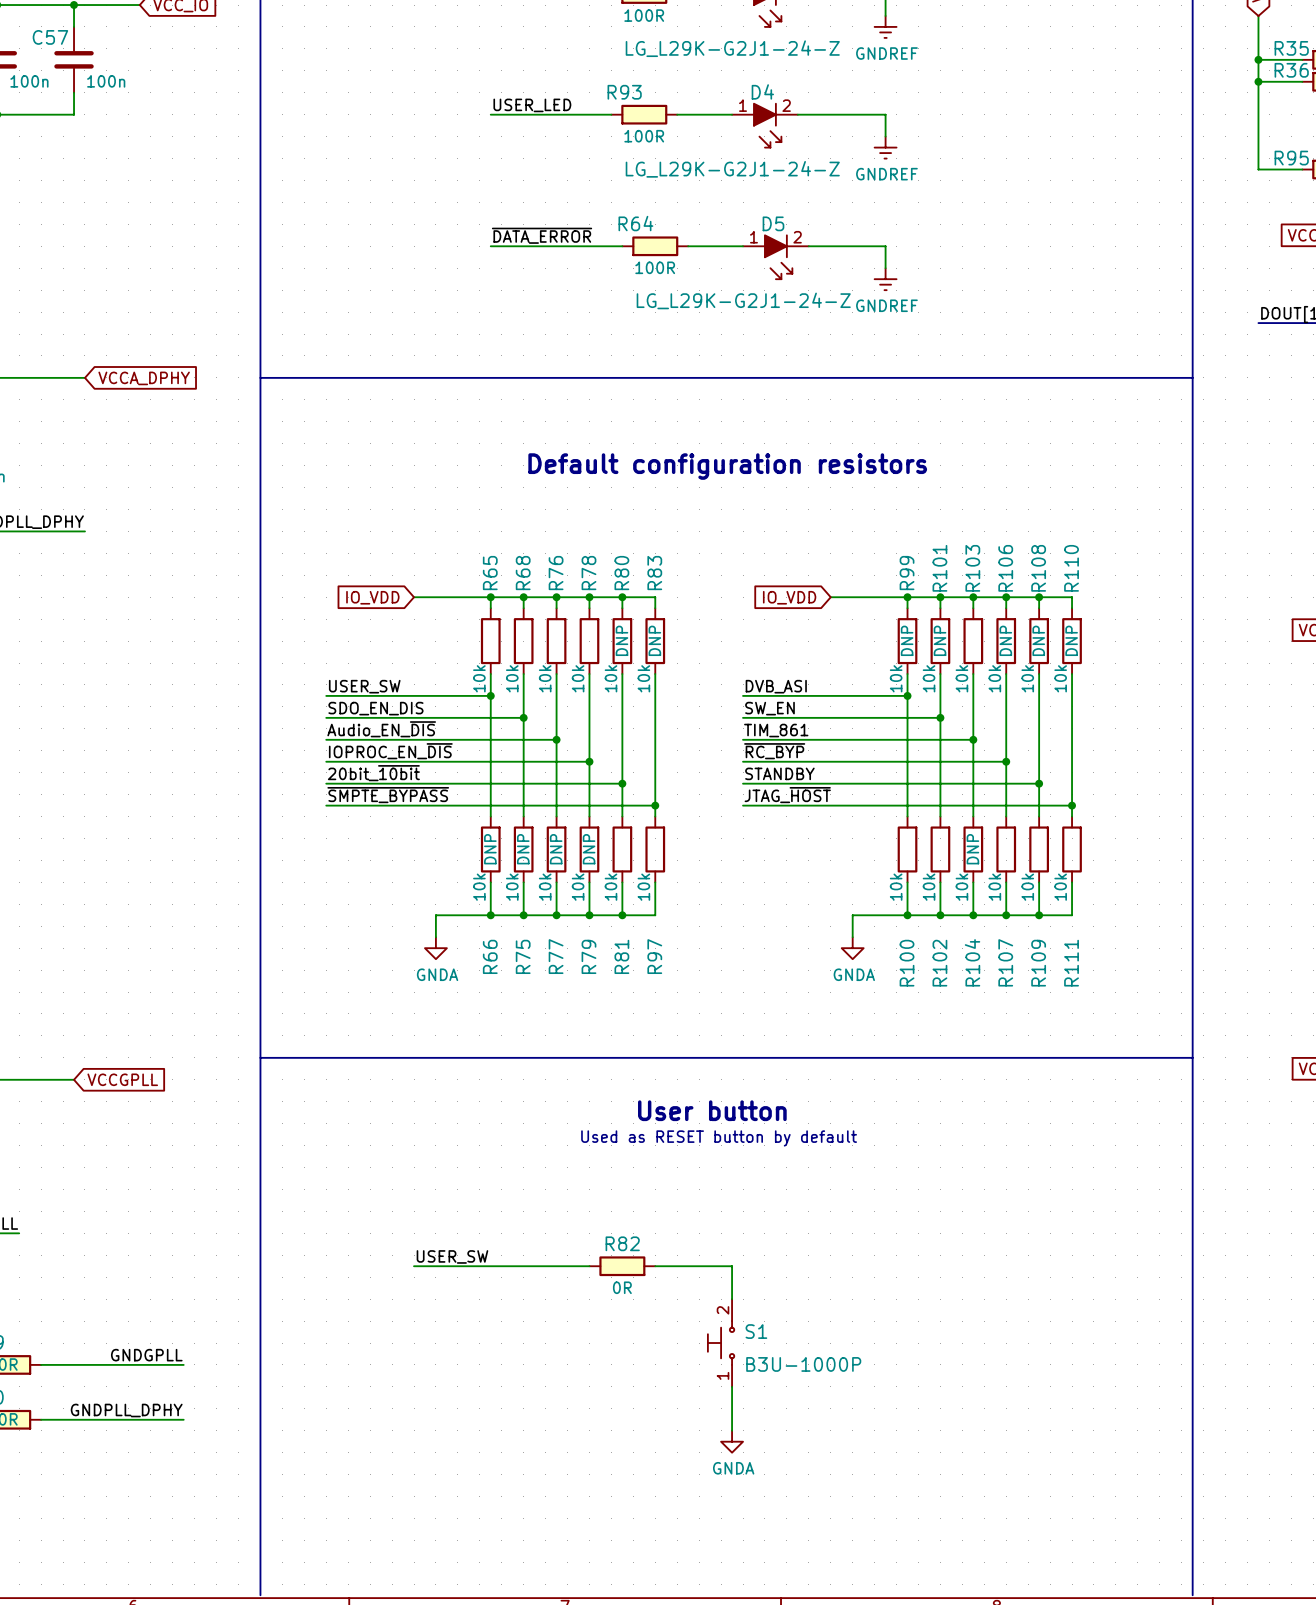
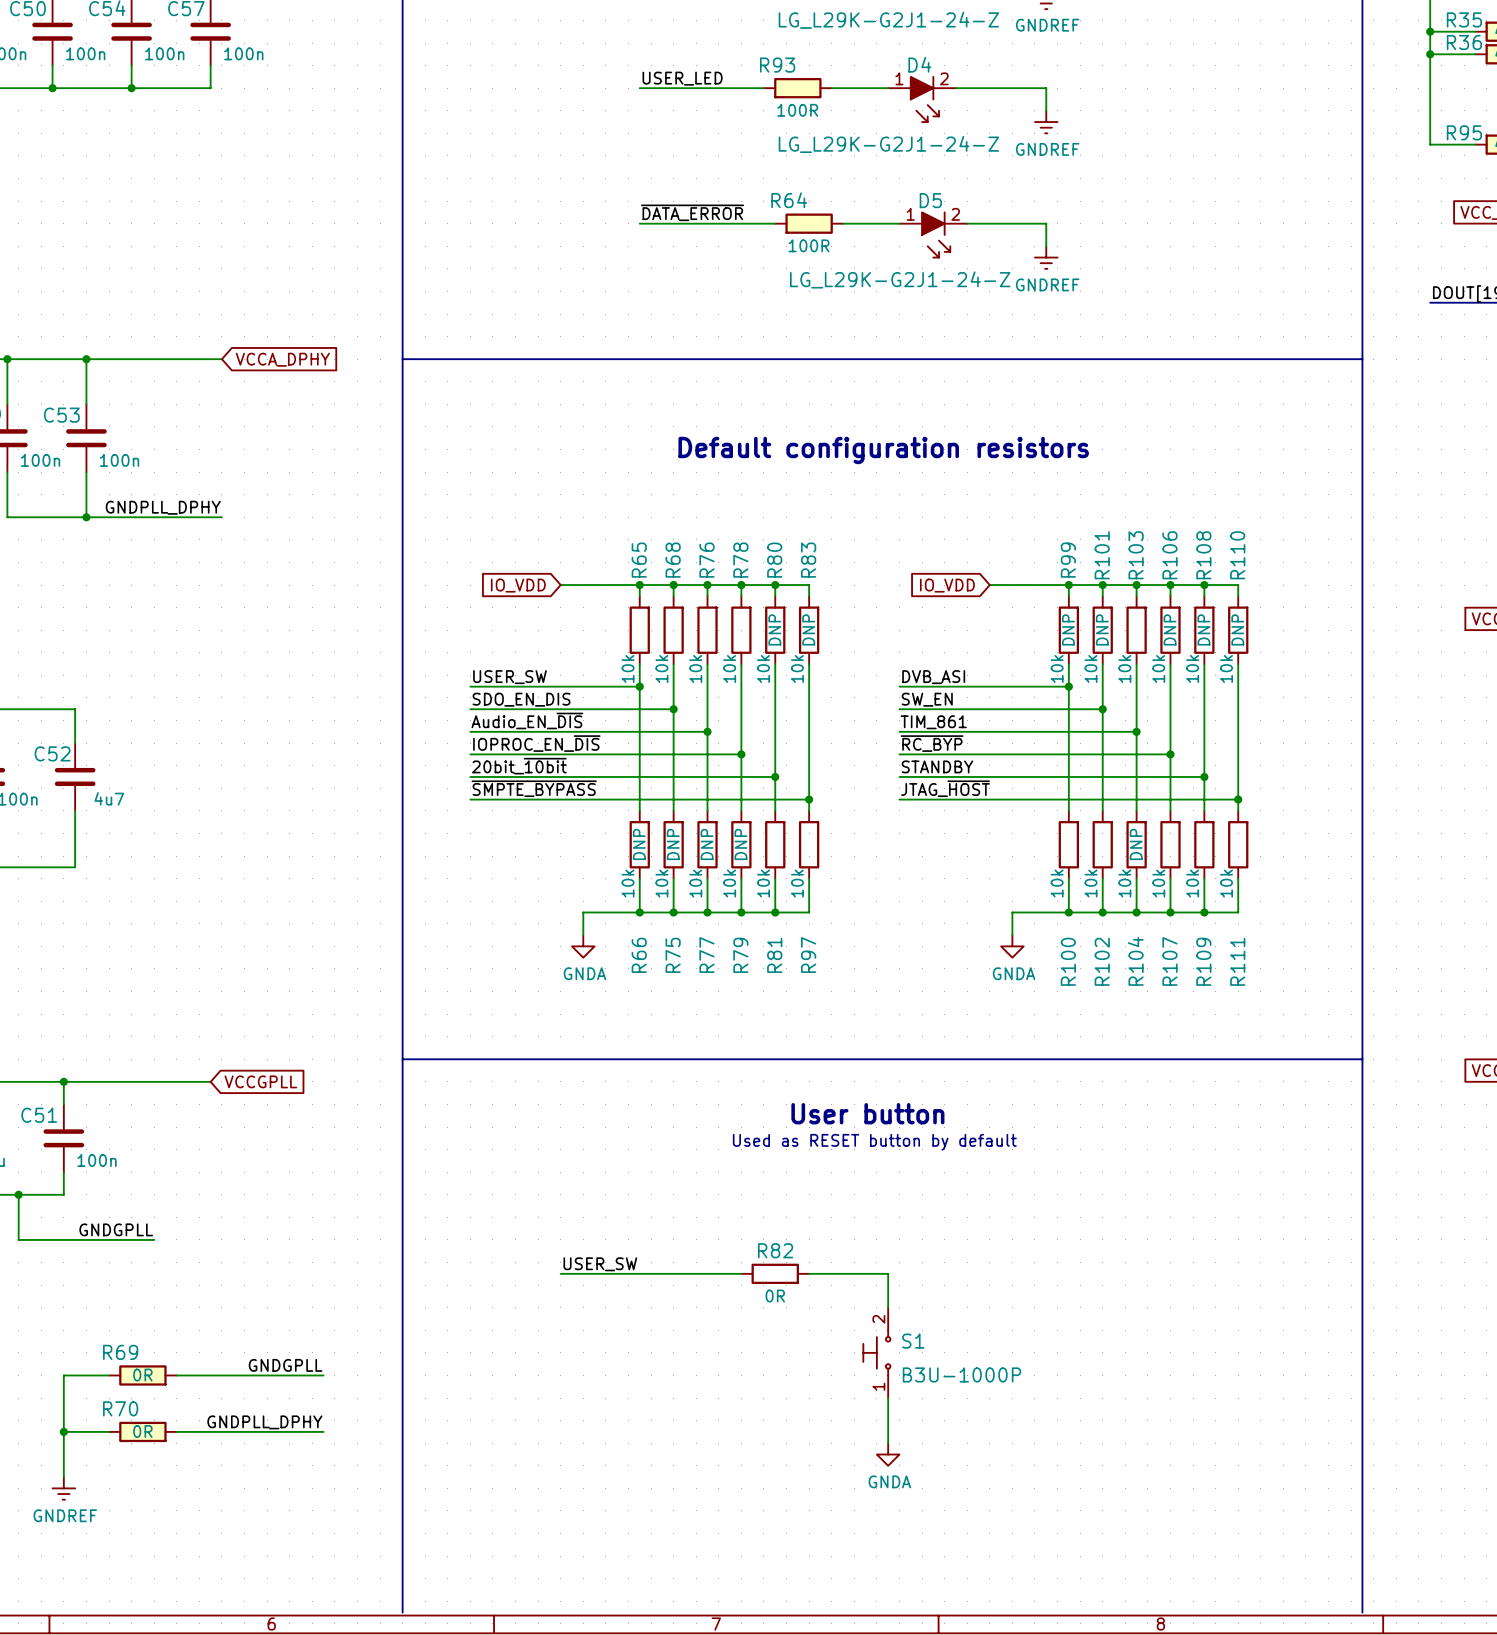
R82 symbol: [589, 1256, 656, 1277] -> [741, 1263, 810, 1285]

